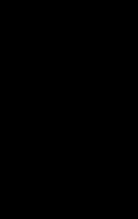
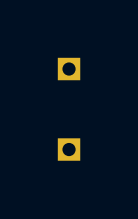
part: none -> (69, 69)
part: none -> (69, 149)

